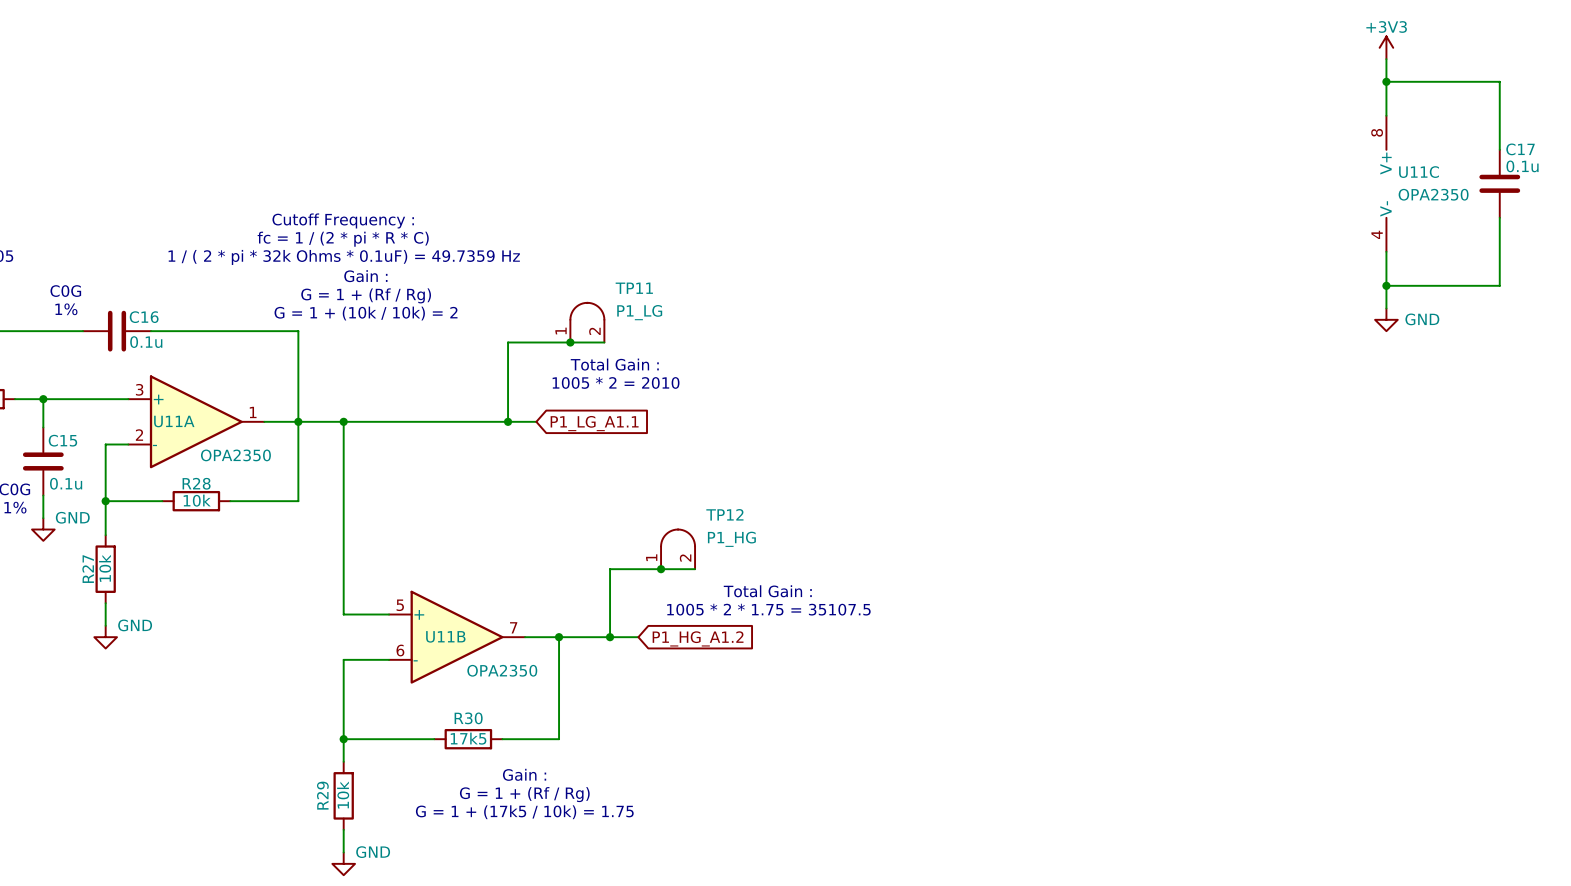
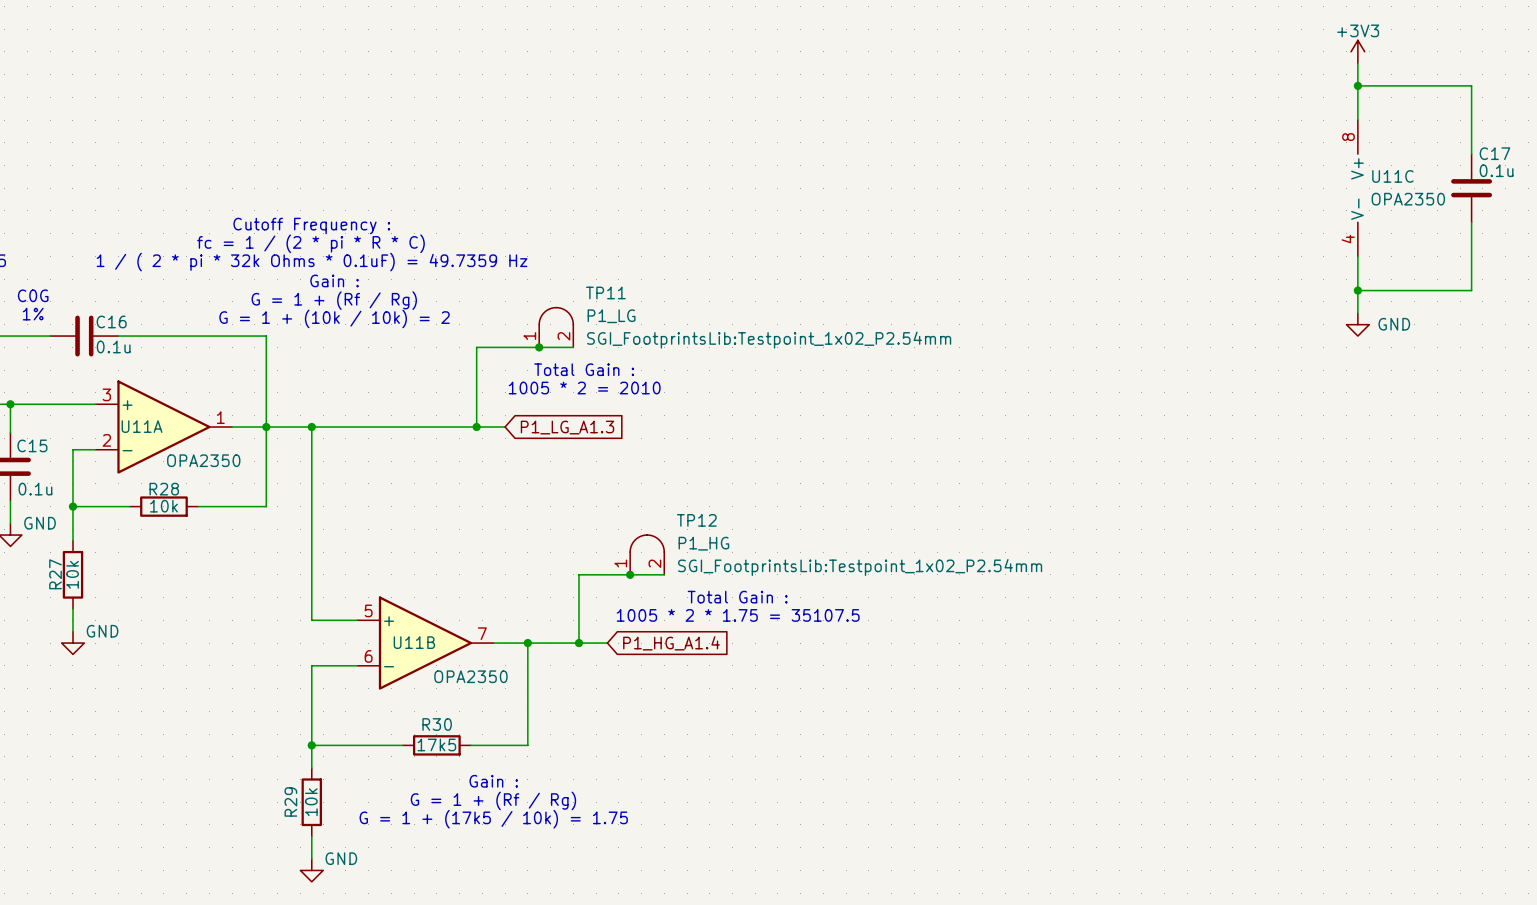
TP11 text: none -> SGI_FootprintsLib:Testpoint_1x02_P2.54mm (769, 340)
global label: P1_LG_A1.1 (594, 423) -> P1_LG_A1.3 (567, 427)
TP12 text: none -> SGI_FootprintsLib:Testpoint_1x02_P2.54mm (860, 567)
global label: P1_HG_A1.2 (698, 638) -> P1_HG_A1.4 (671, 643)

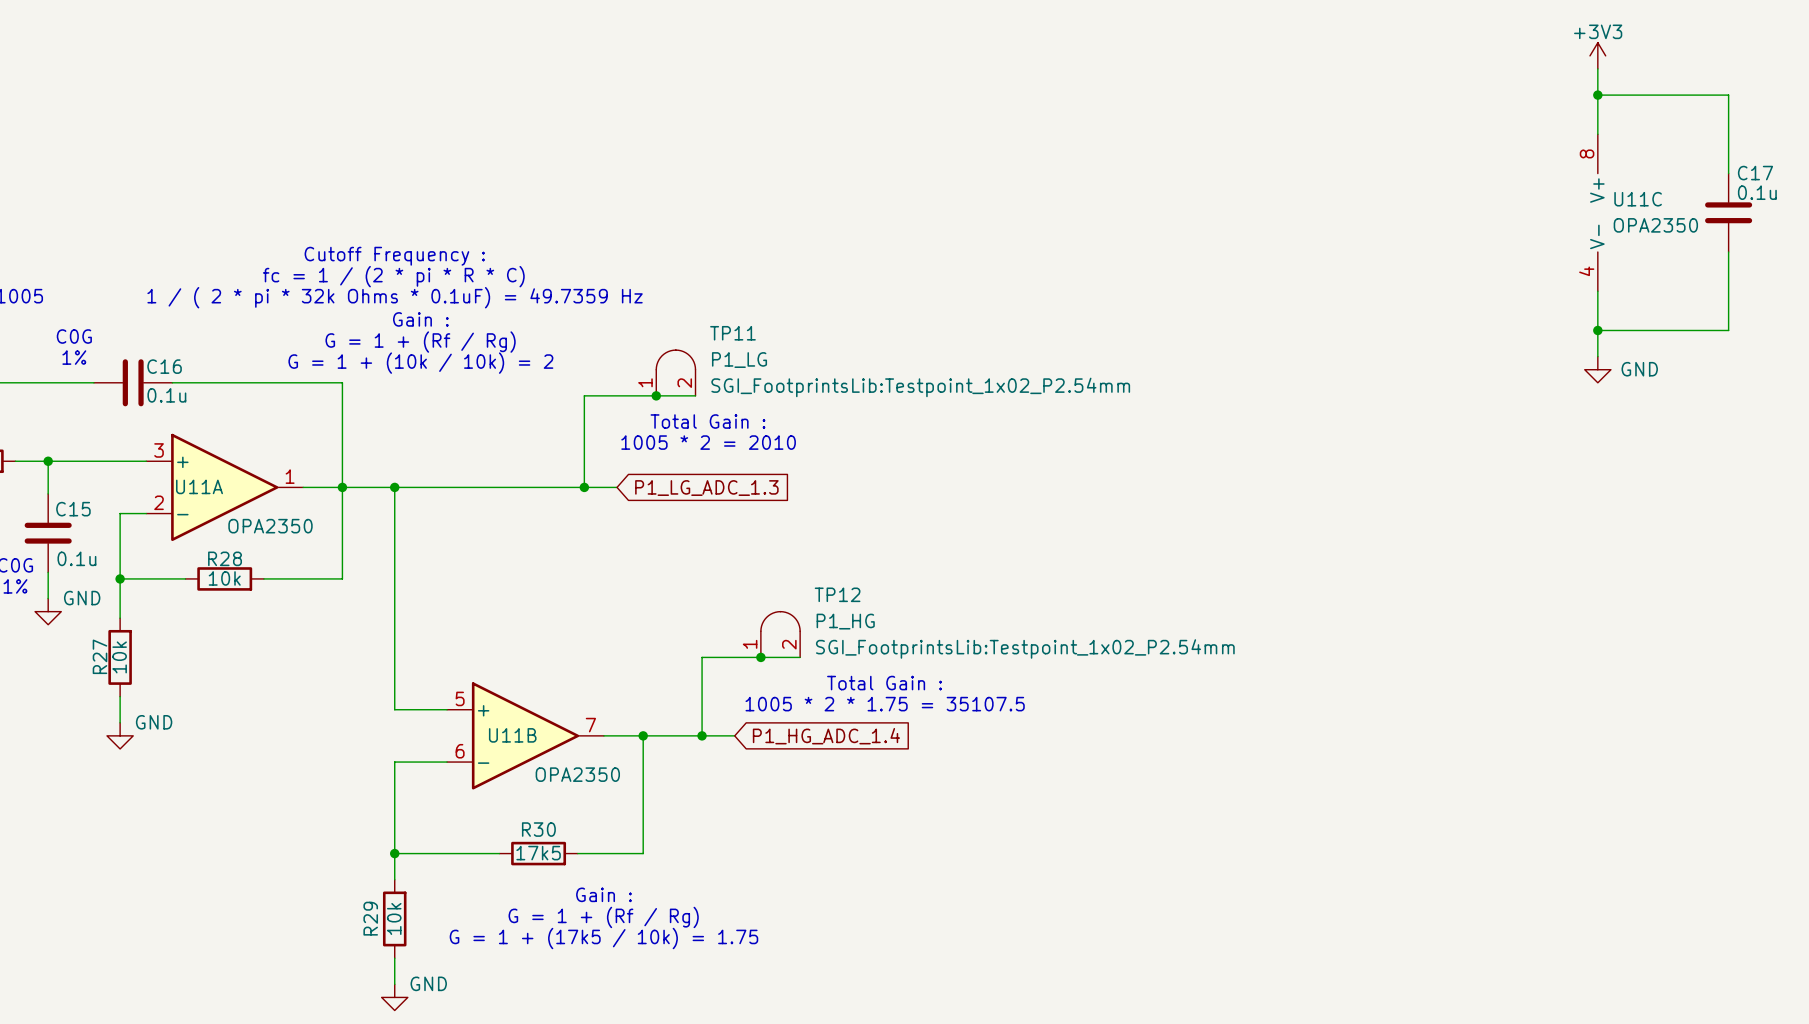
global label: P1_LG_A1.3 (567, 427) -> P1_LG_ADC_1.3 (706, 488)
global label: P1_HG_A1.4 (671, 643) -> P1_HG_ADC_1.4 (826, 736)

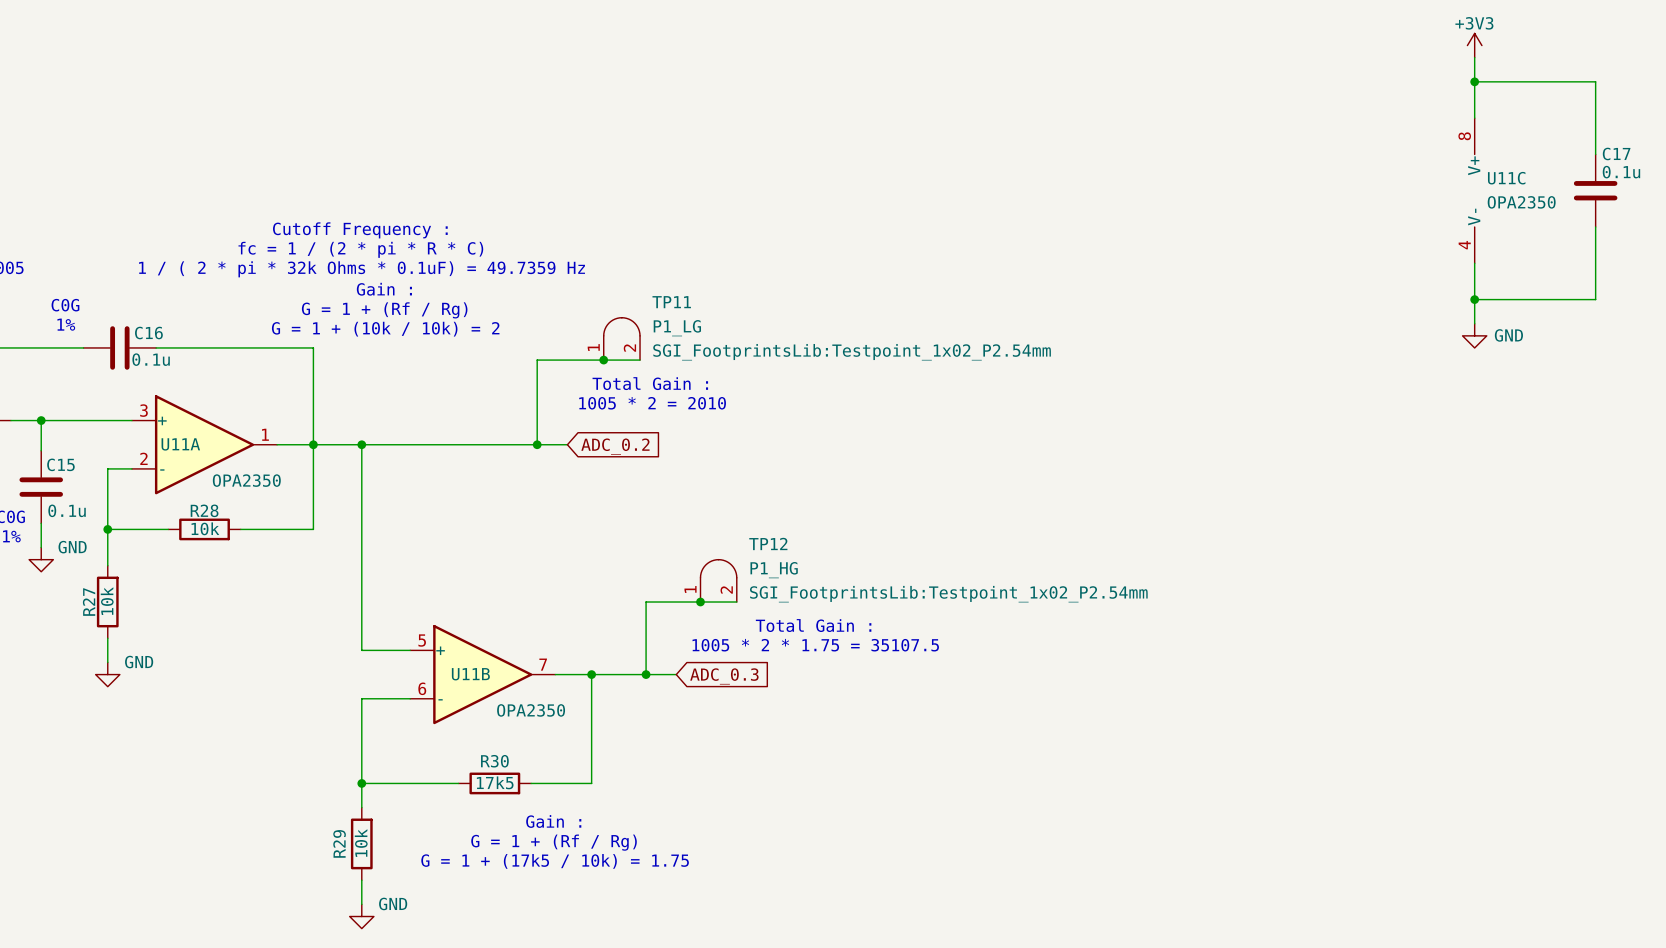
global label: P1_LG_ADC_1.3 (706, 488) -> ADC_0.2 (615, 446)
global label: P1_HG_ADC_1.4 (826, 736) -> ADC_0.3 (724, 676)

